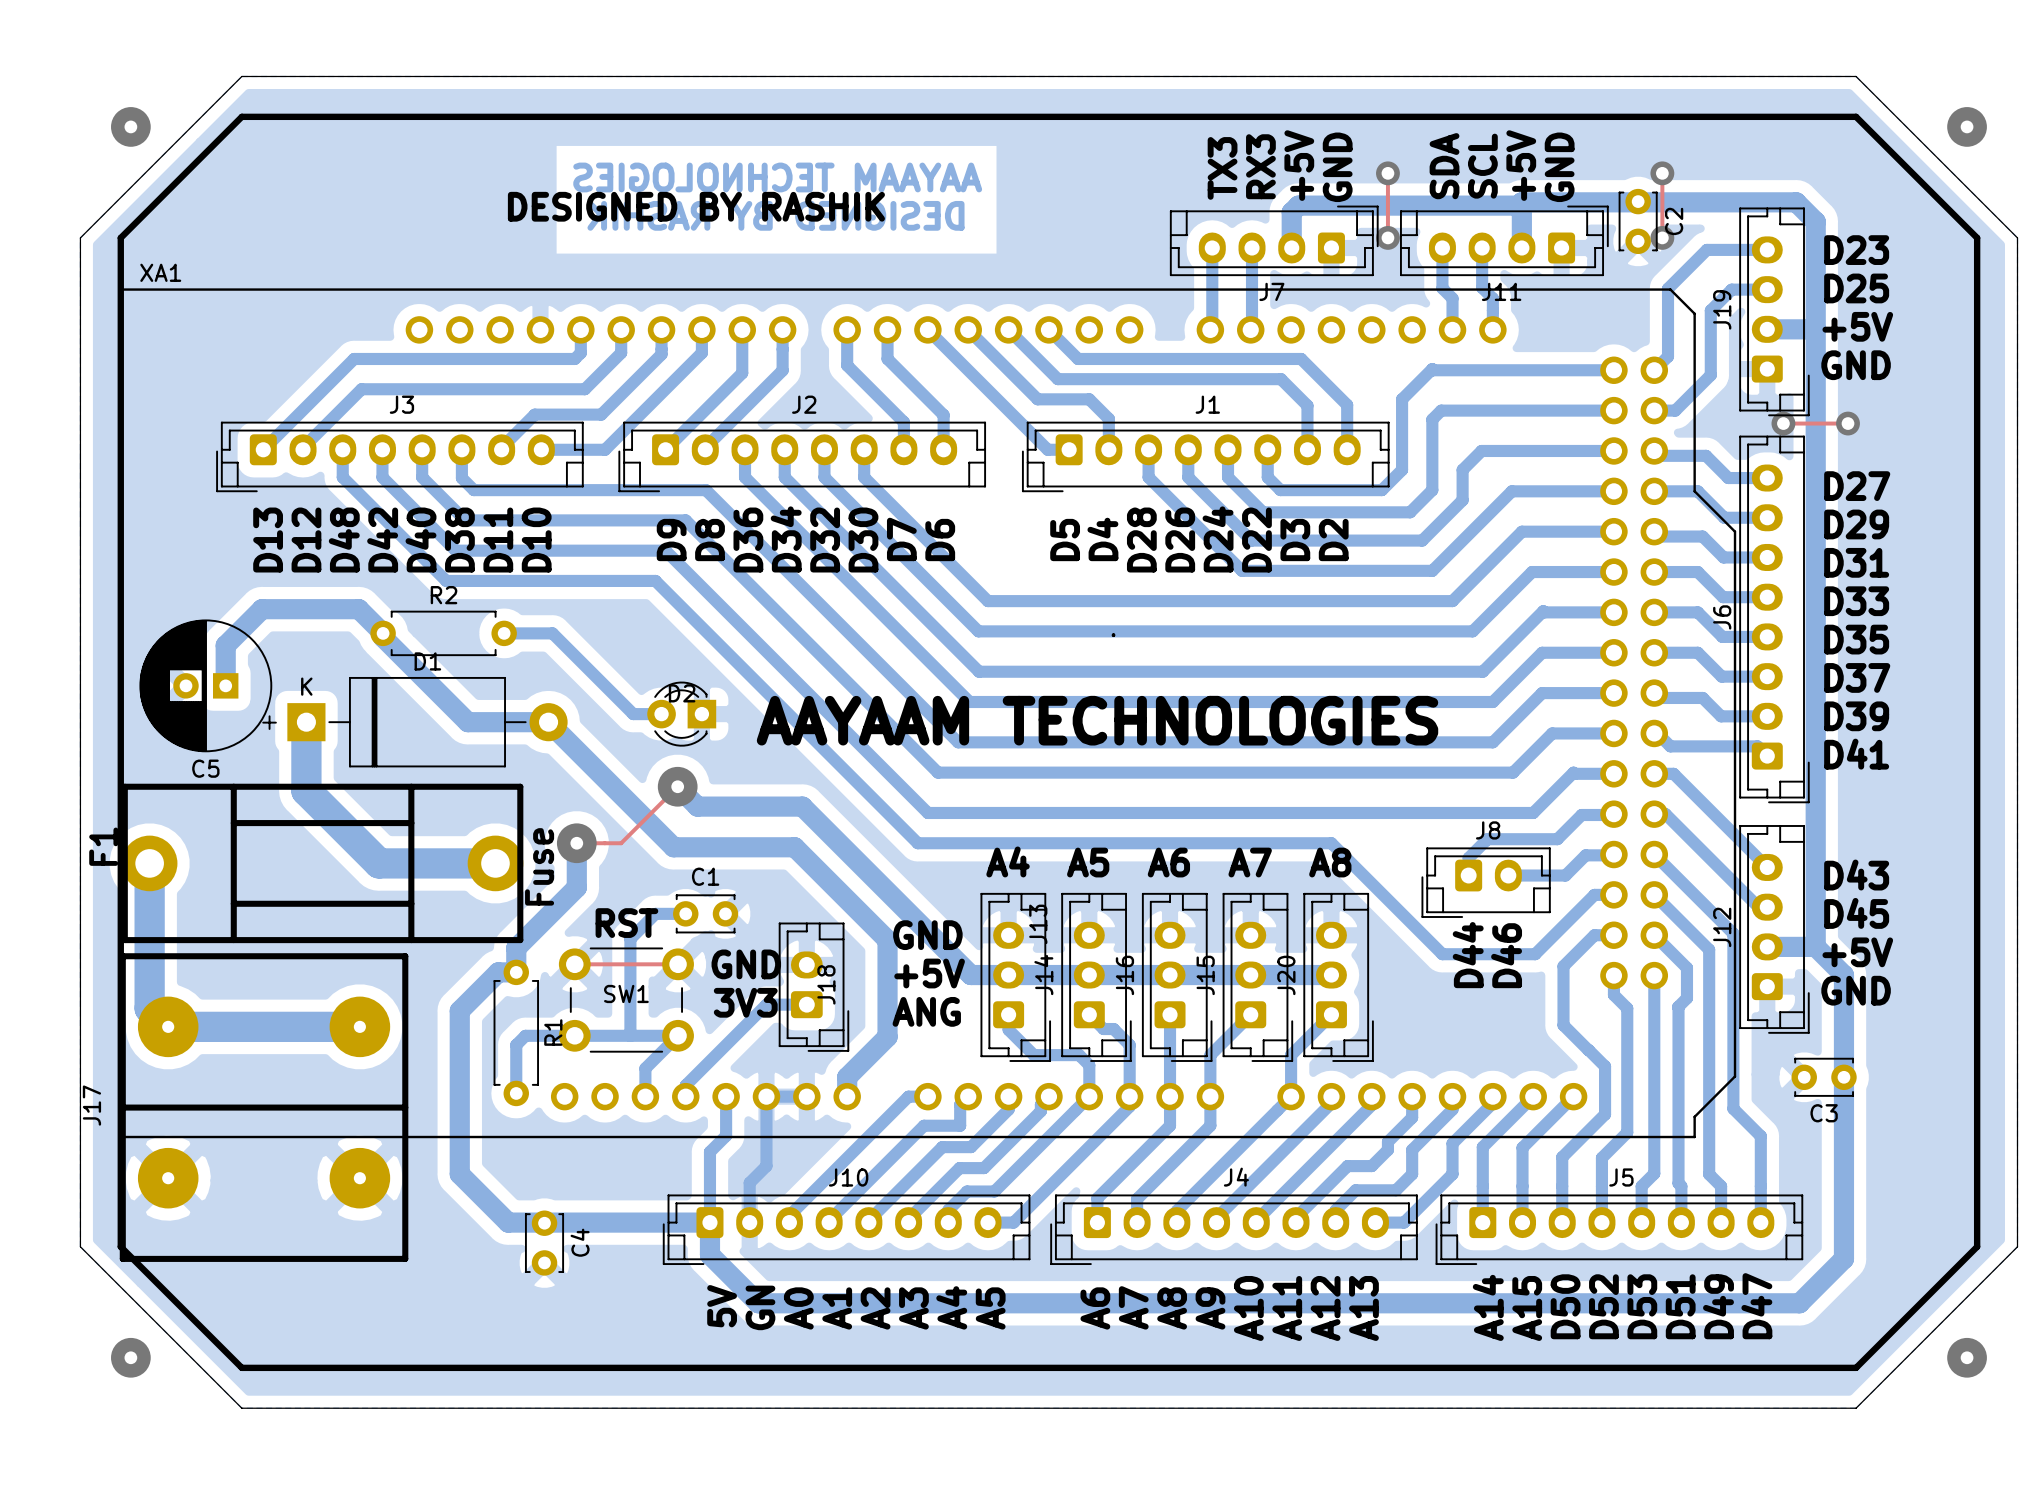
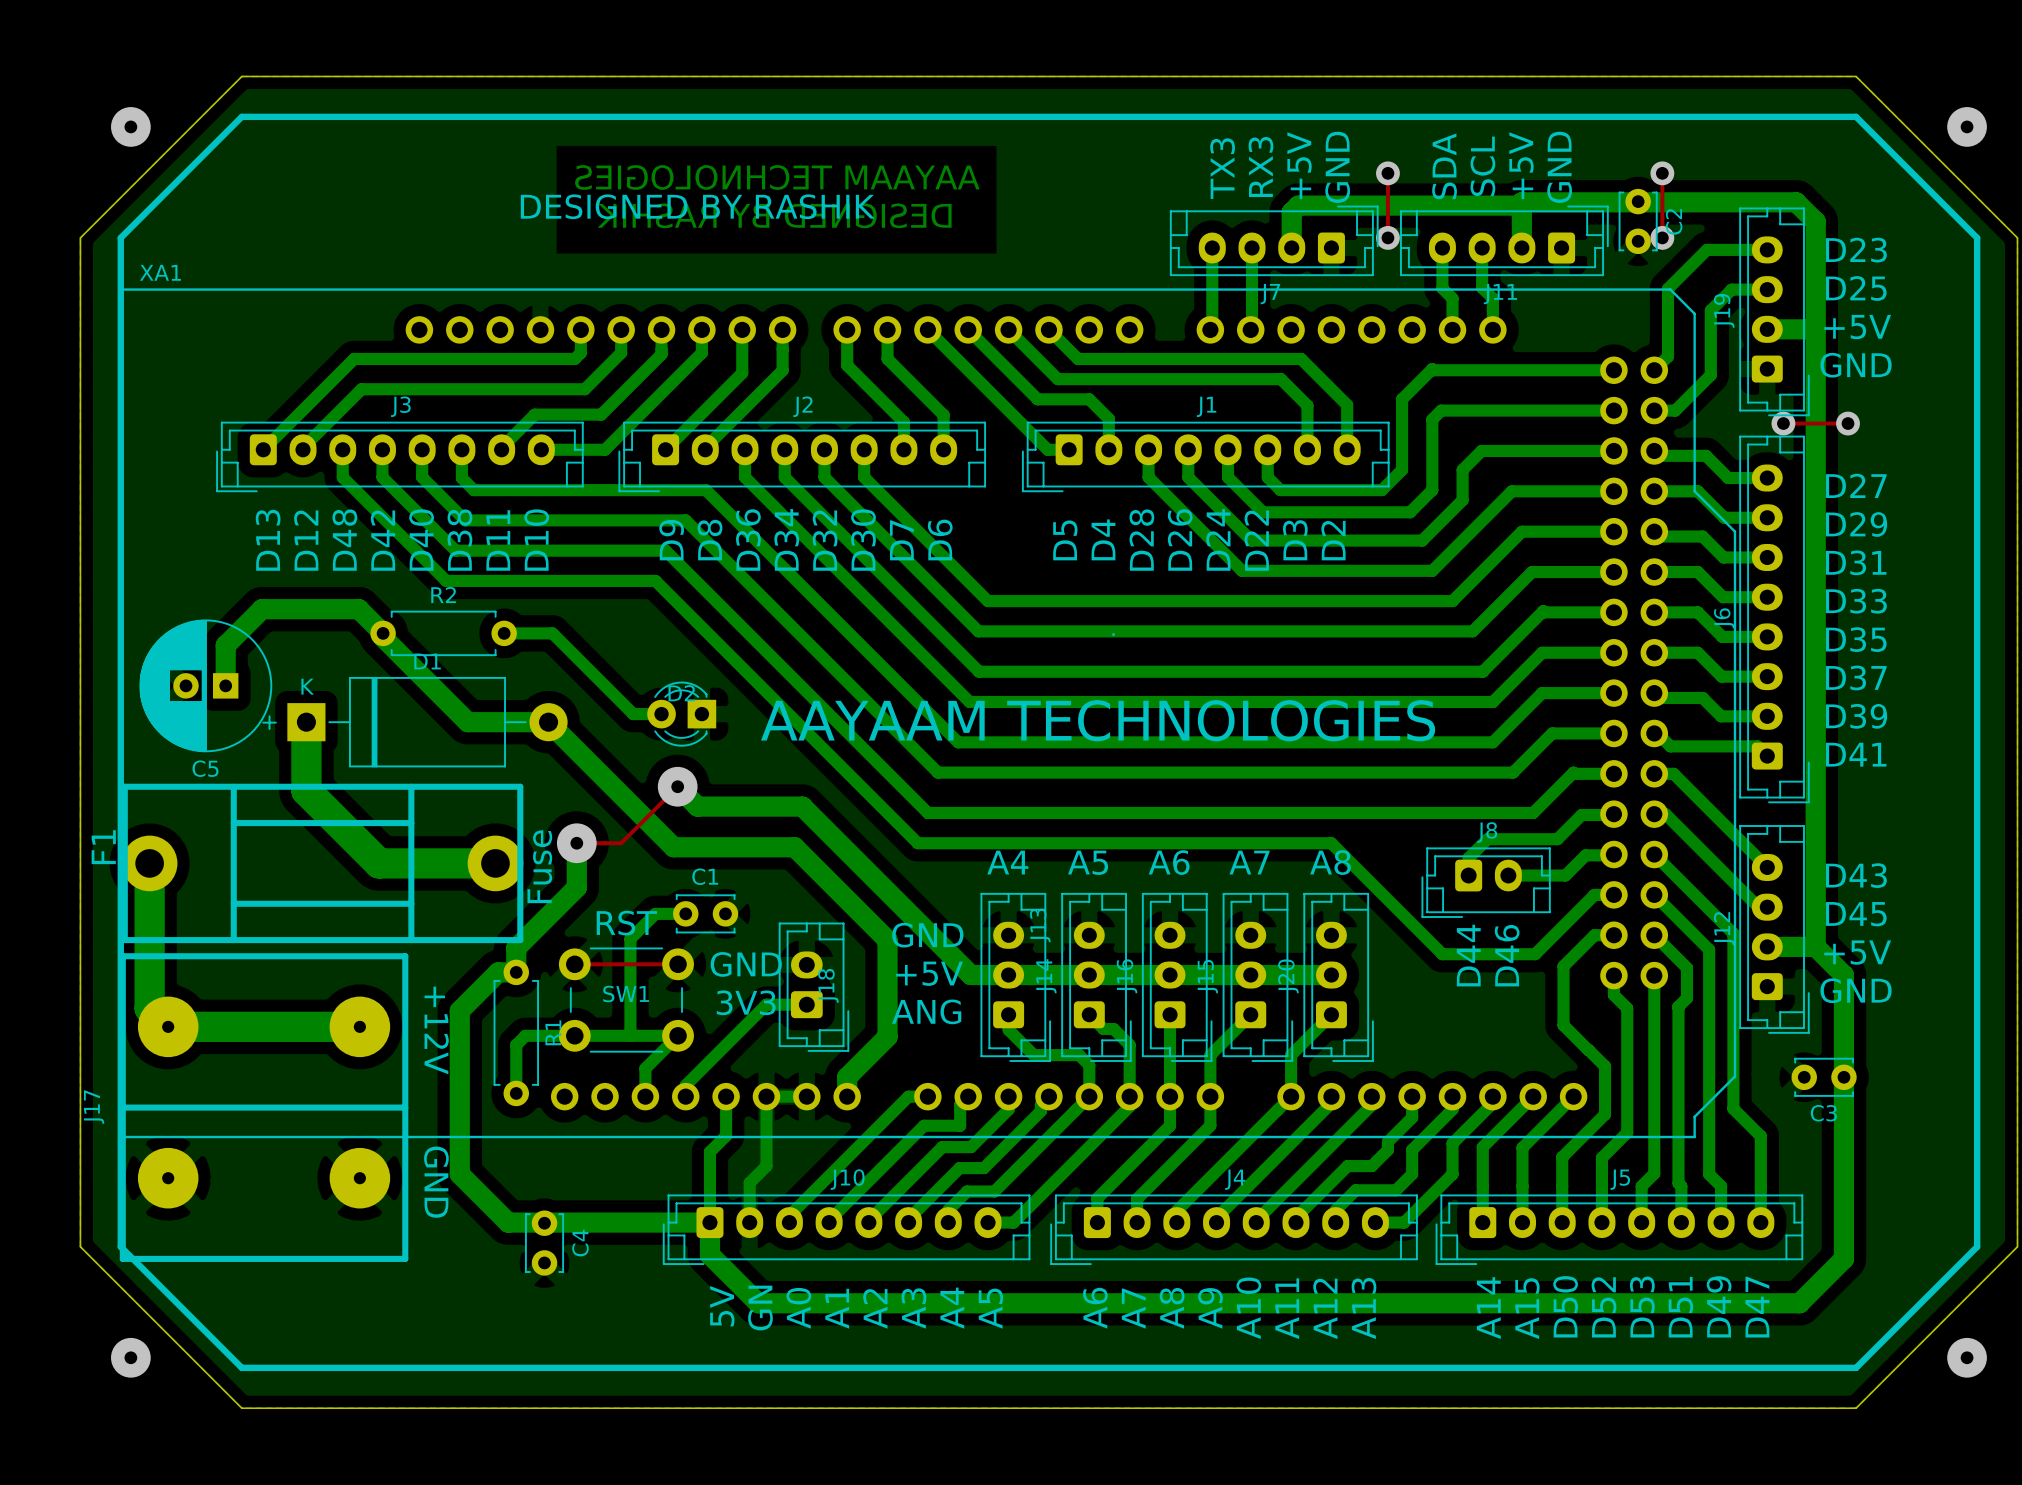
text: none -> +12V (436, 1030)
text: none -> GND (436, 1182)

